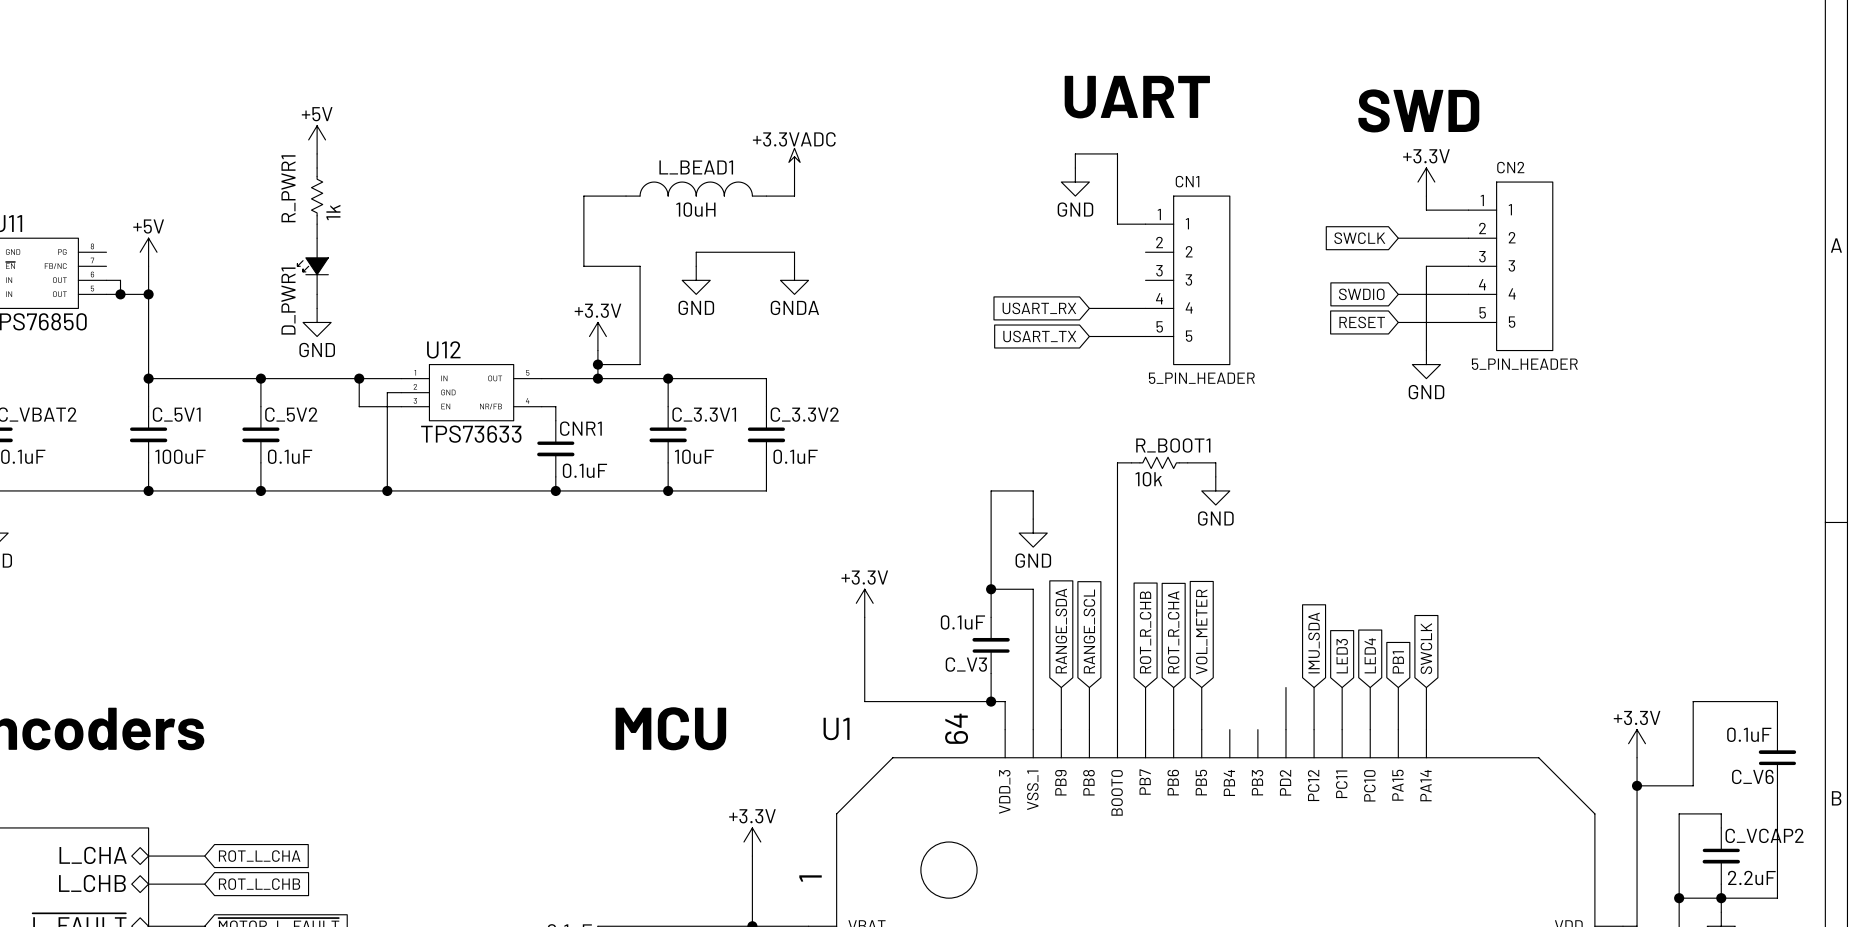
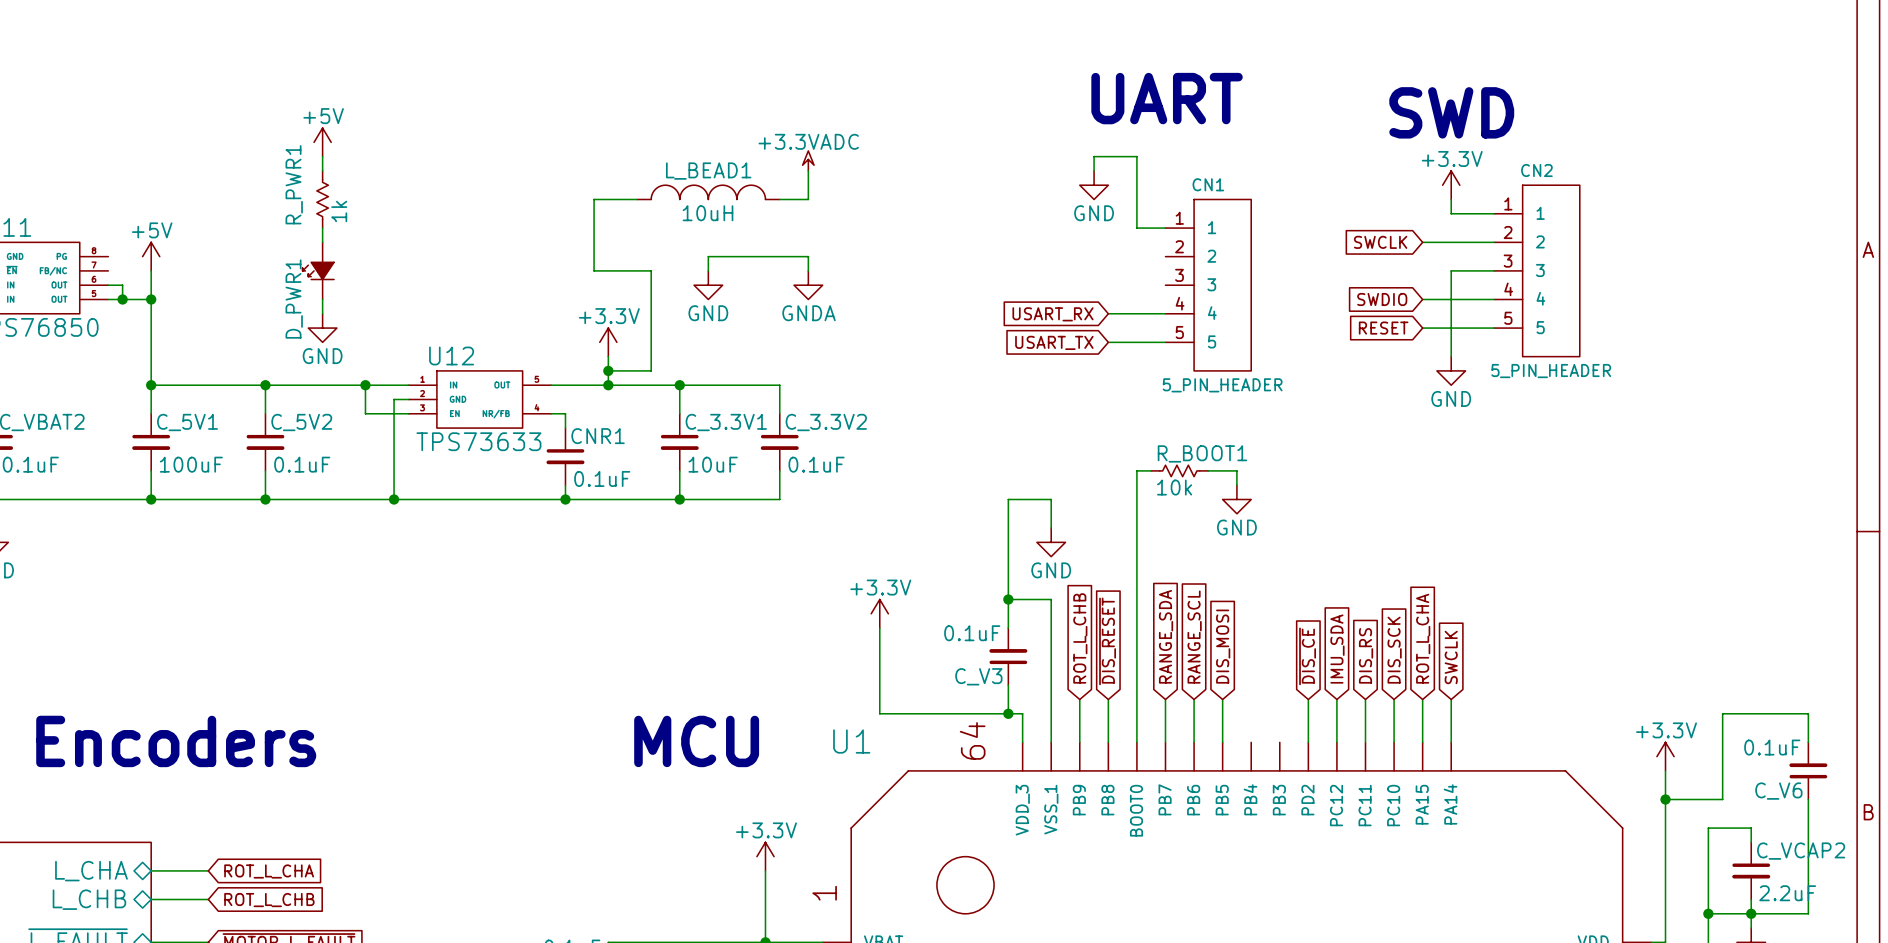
global label: RANGE_SDA (1061, 631) -> ROT_L_CHB (1080, 638)
global label: RANGE_SCL (1089, 631) -> ~{DIS_RESET} (1107, 641)
global label: VOL_METER (1201, 631) -> DIS_MOSI (1223, 646)
global label: ROT_R_CHB (1145, 632) -> RANGE_SDA (1166, 636)
global label: ROT_R_CHA (1173, 632) -> RANGE_SCL (1194, 637)
global label: none -> ~{DIS_CE} (1307, 656)
global label: LED4 (1370, 655) -> DIS_SCK (1394, 650)
global label: LED3 (1342, 656) -> DIS_RS (1366, 655)
global label: PB1 (1398, 662) -> ROT_L_CHA (1423, 638)

